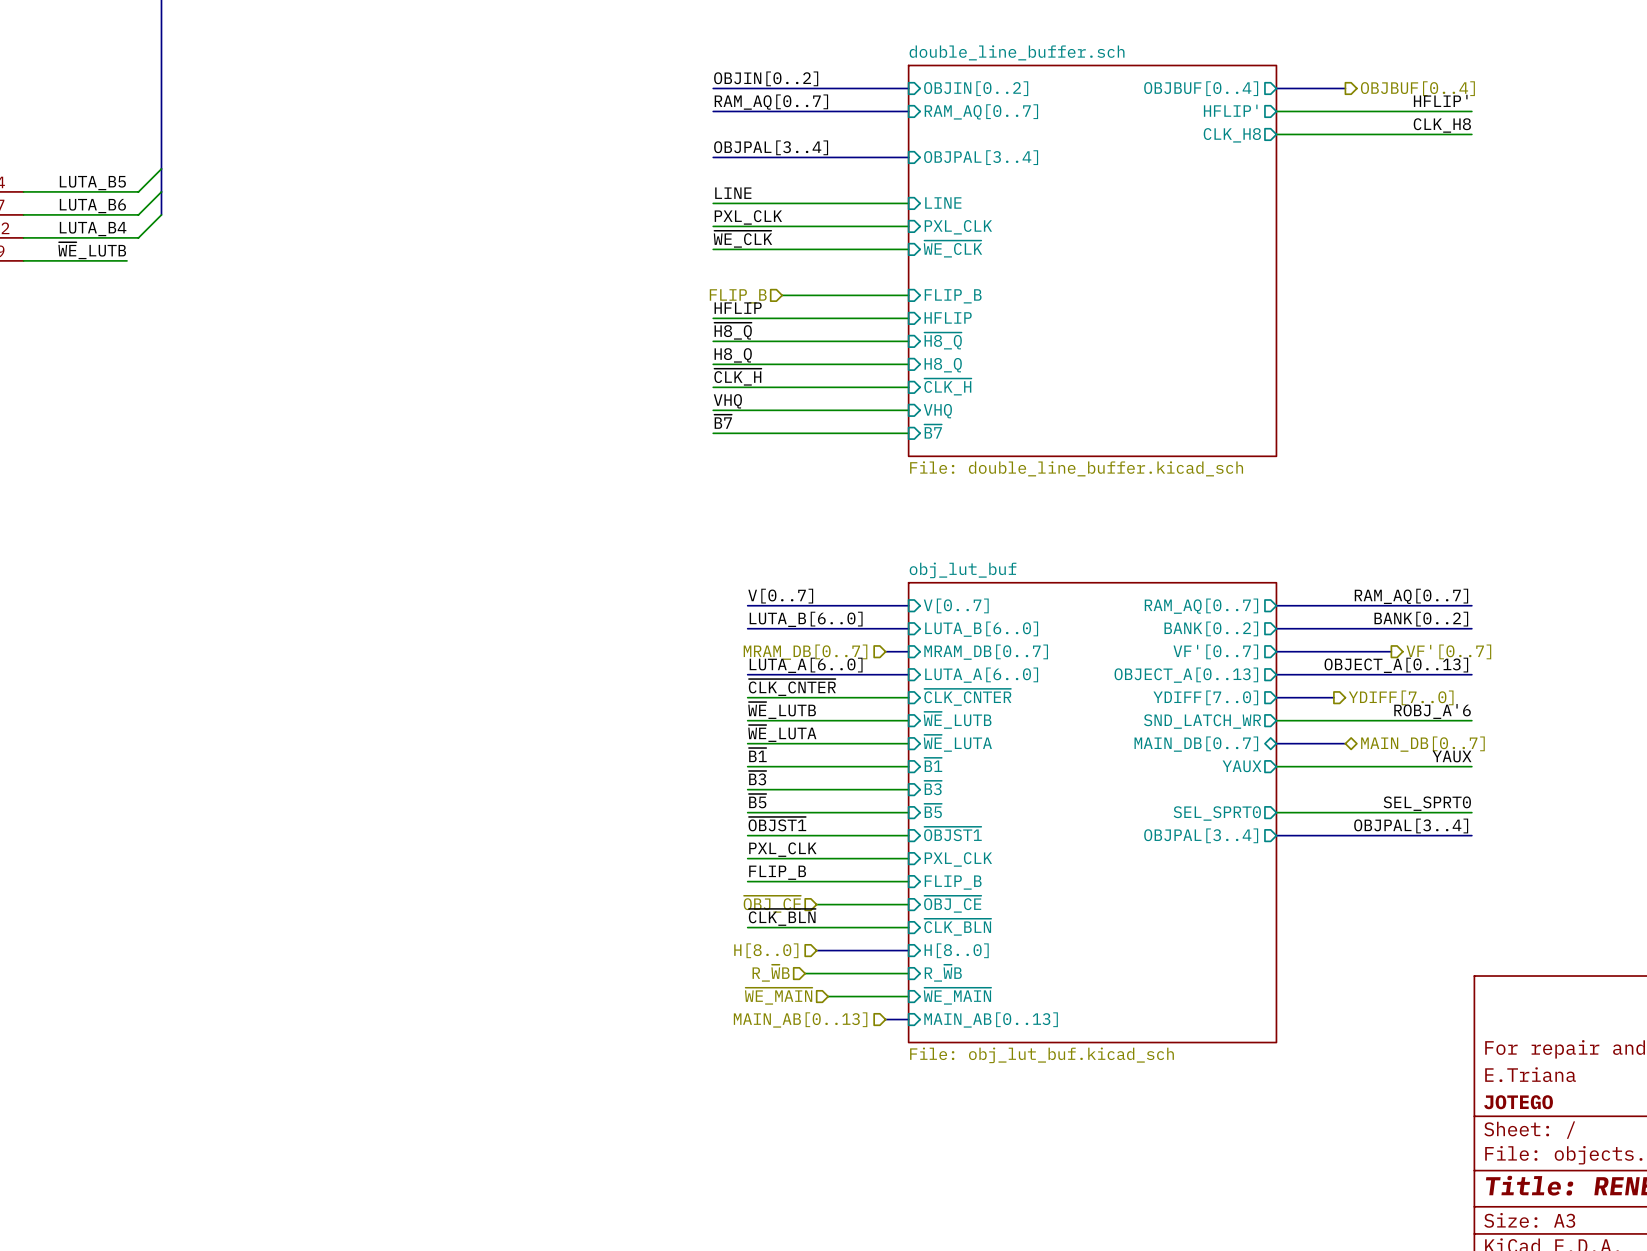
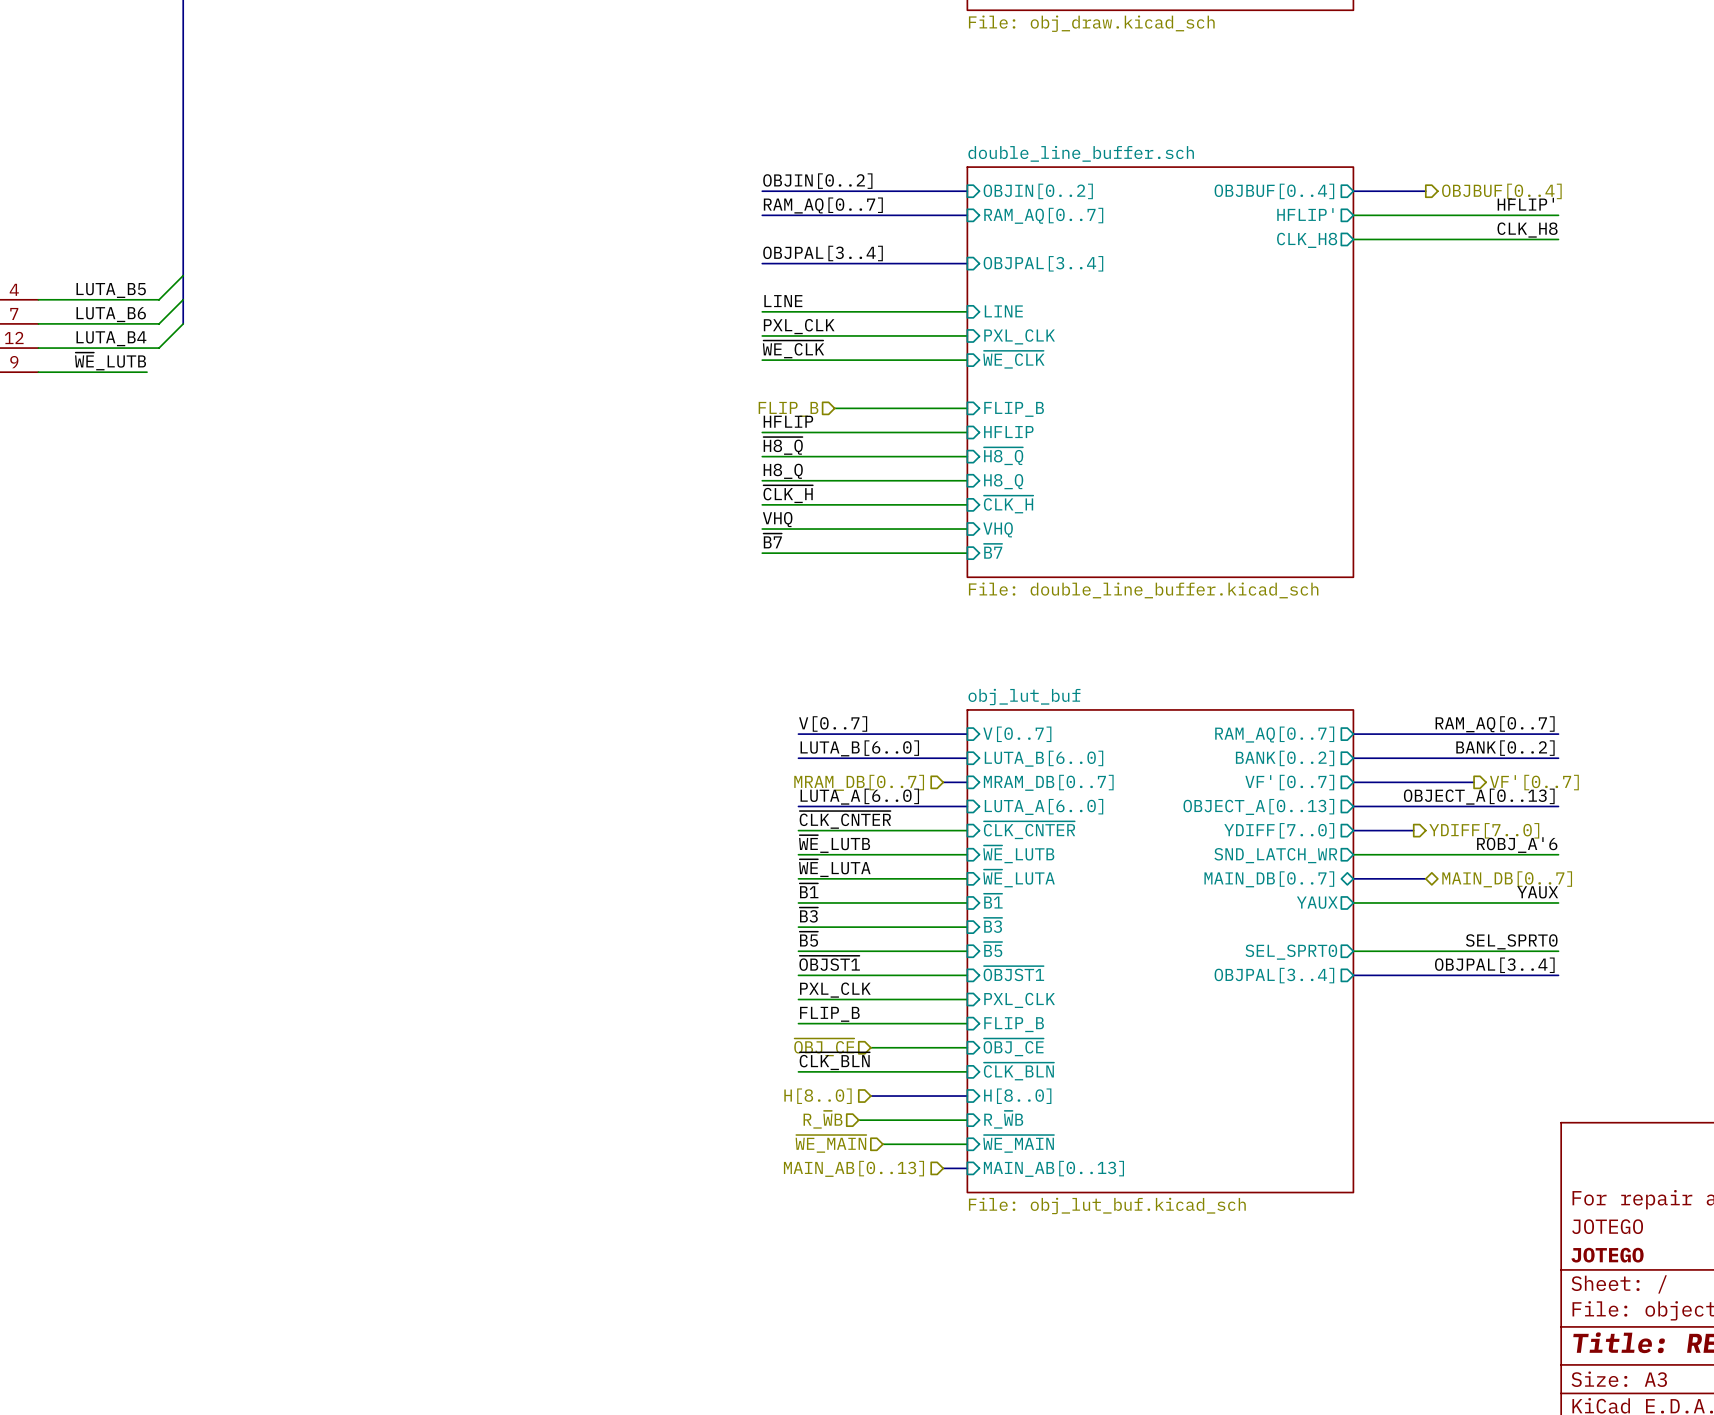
title block: E.Triana (1530, 1074) -> JOTEGO (1607, 1226)

